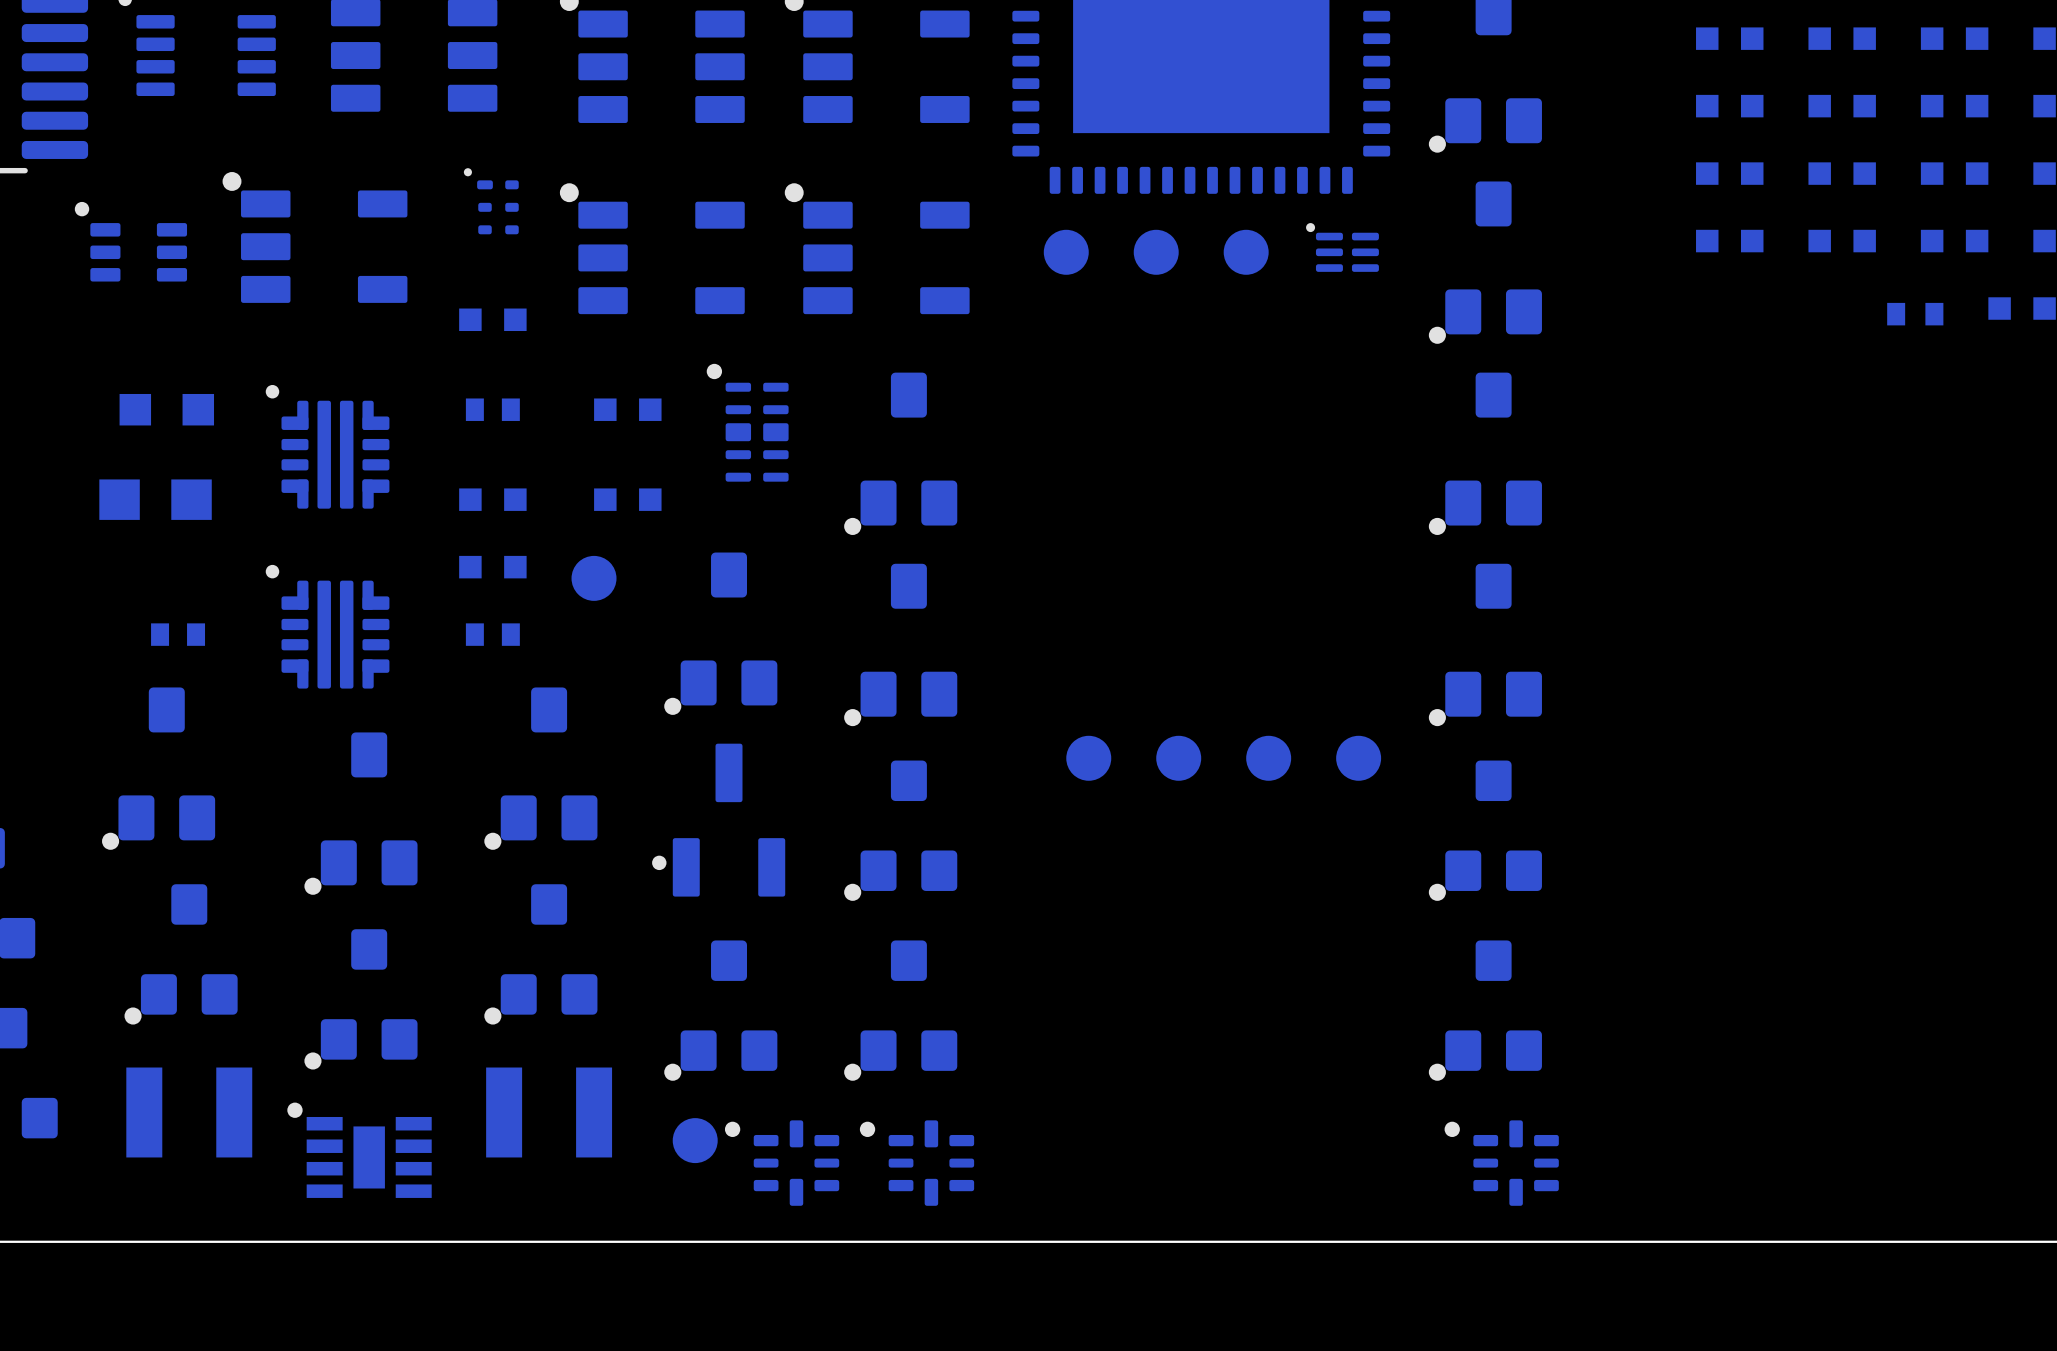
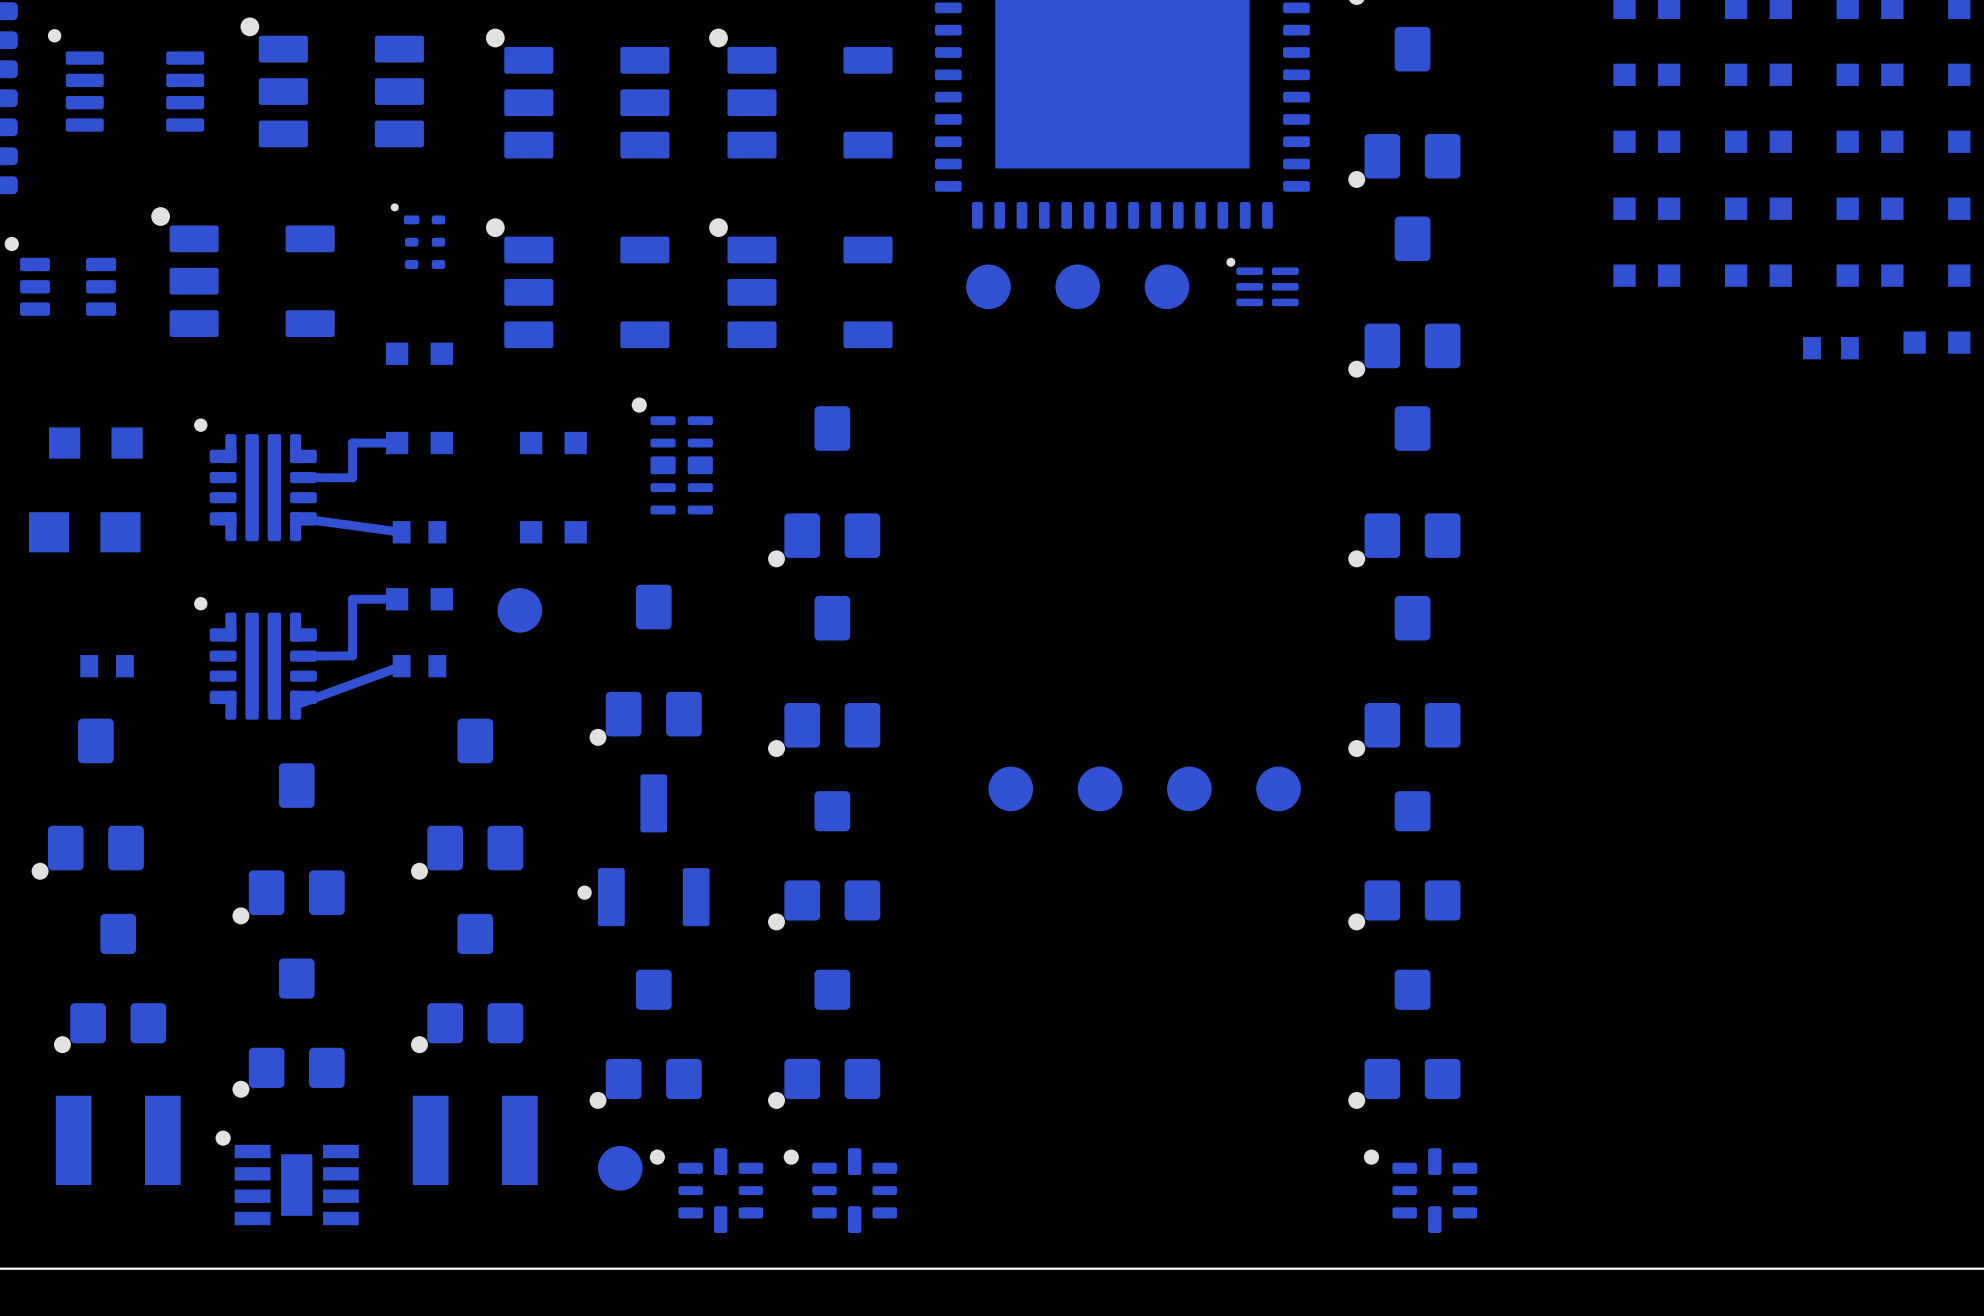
part footprint: [465, 398, 520, 421] -> [386, 431, 453, 455]
track: none -> (397, 443) (352, 443) (352, 477) (303, 477)
track: none -> (303, 518) (401, 532)
part footprint: [459, 488, 527, 511] -> [392, 521, 447, 544]
track: none -> (397, 599) (352, 599) (352, 655) (303, 656)
track: none -> (401, 666) (295, 705)

